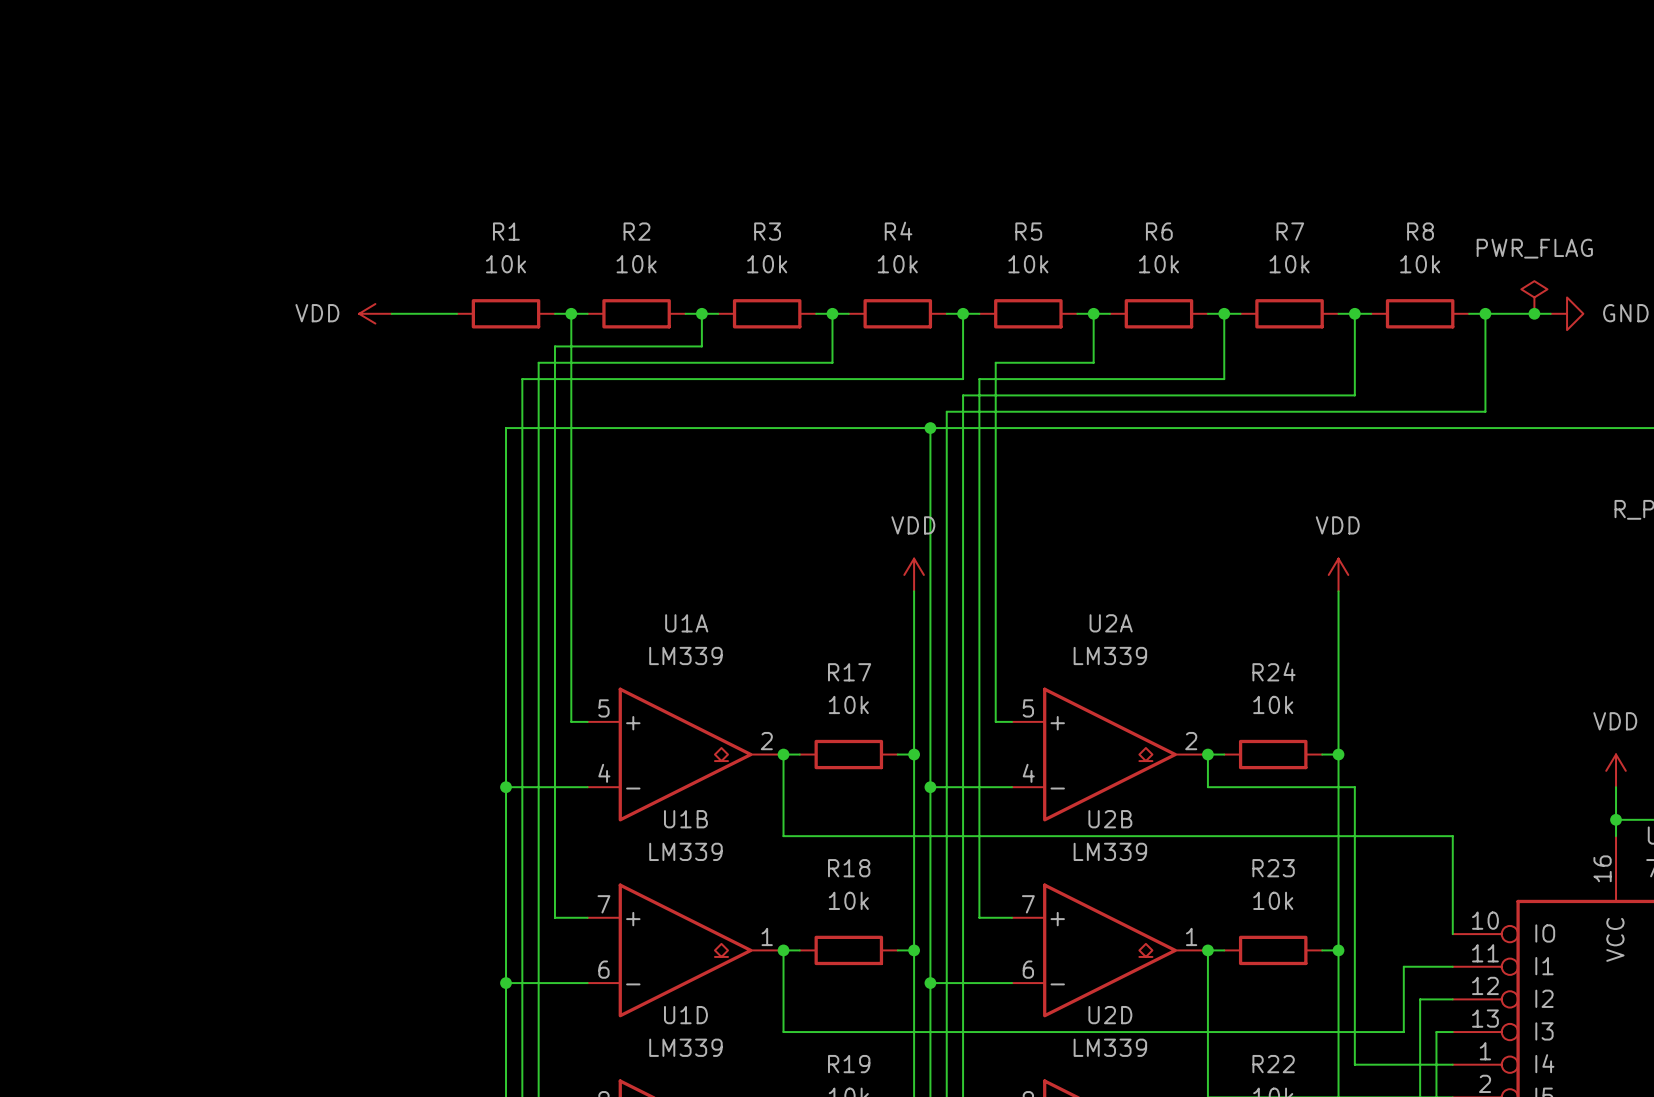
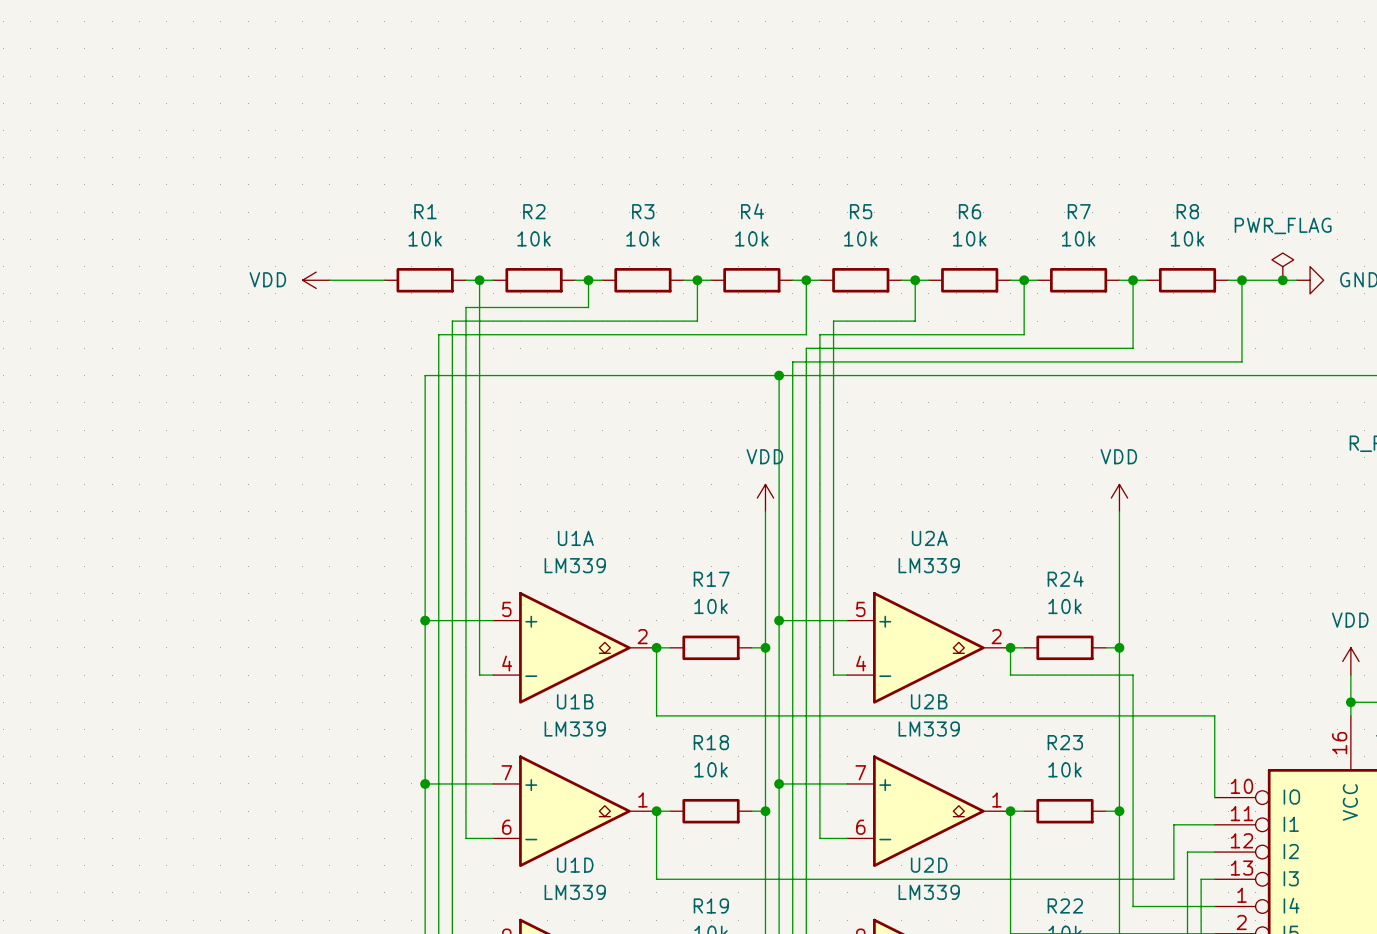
junction: none -> (425, 620)
junction: none -> (779, 620)
wire: (506, 787) (571, 787) -> (425, 620) (479, 620) (479, 675)
junction: (506, 787) -> none
wire: (930, 787) (995, 787) -> (779, 620) (833, 620) (833, 675)
junction: (930, 787) -> none
junction: none -> (425, 783)
junction: none -> (779, 783)
wire: (506, 983) (554, 983) -> (425, 783) (465, 783) (465, 838)
junction: (506, 983) -> none
wire: (930, 983) (979, 983) -> (779, 783) (819, 783) (819, 838)
junction: (930, 983) -> none

